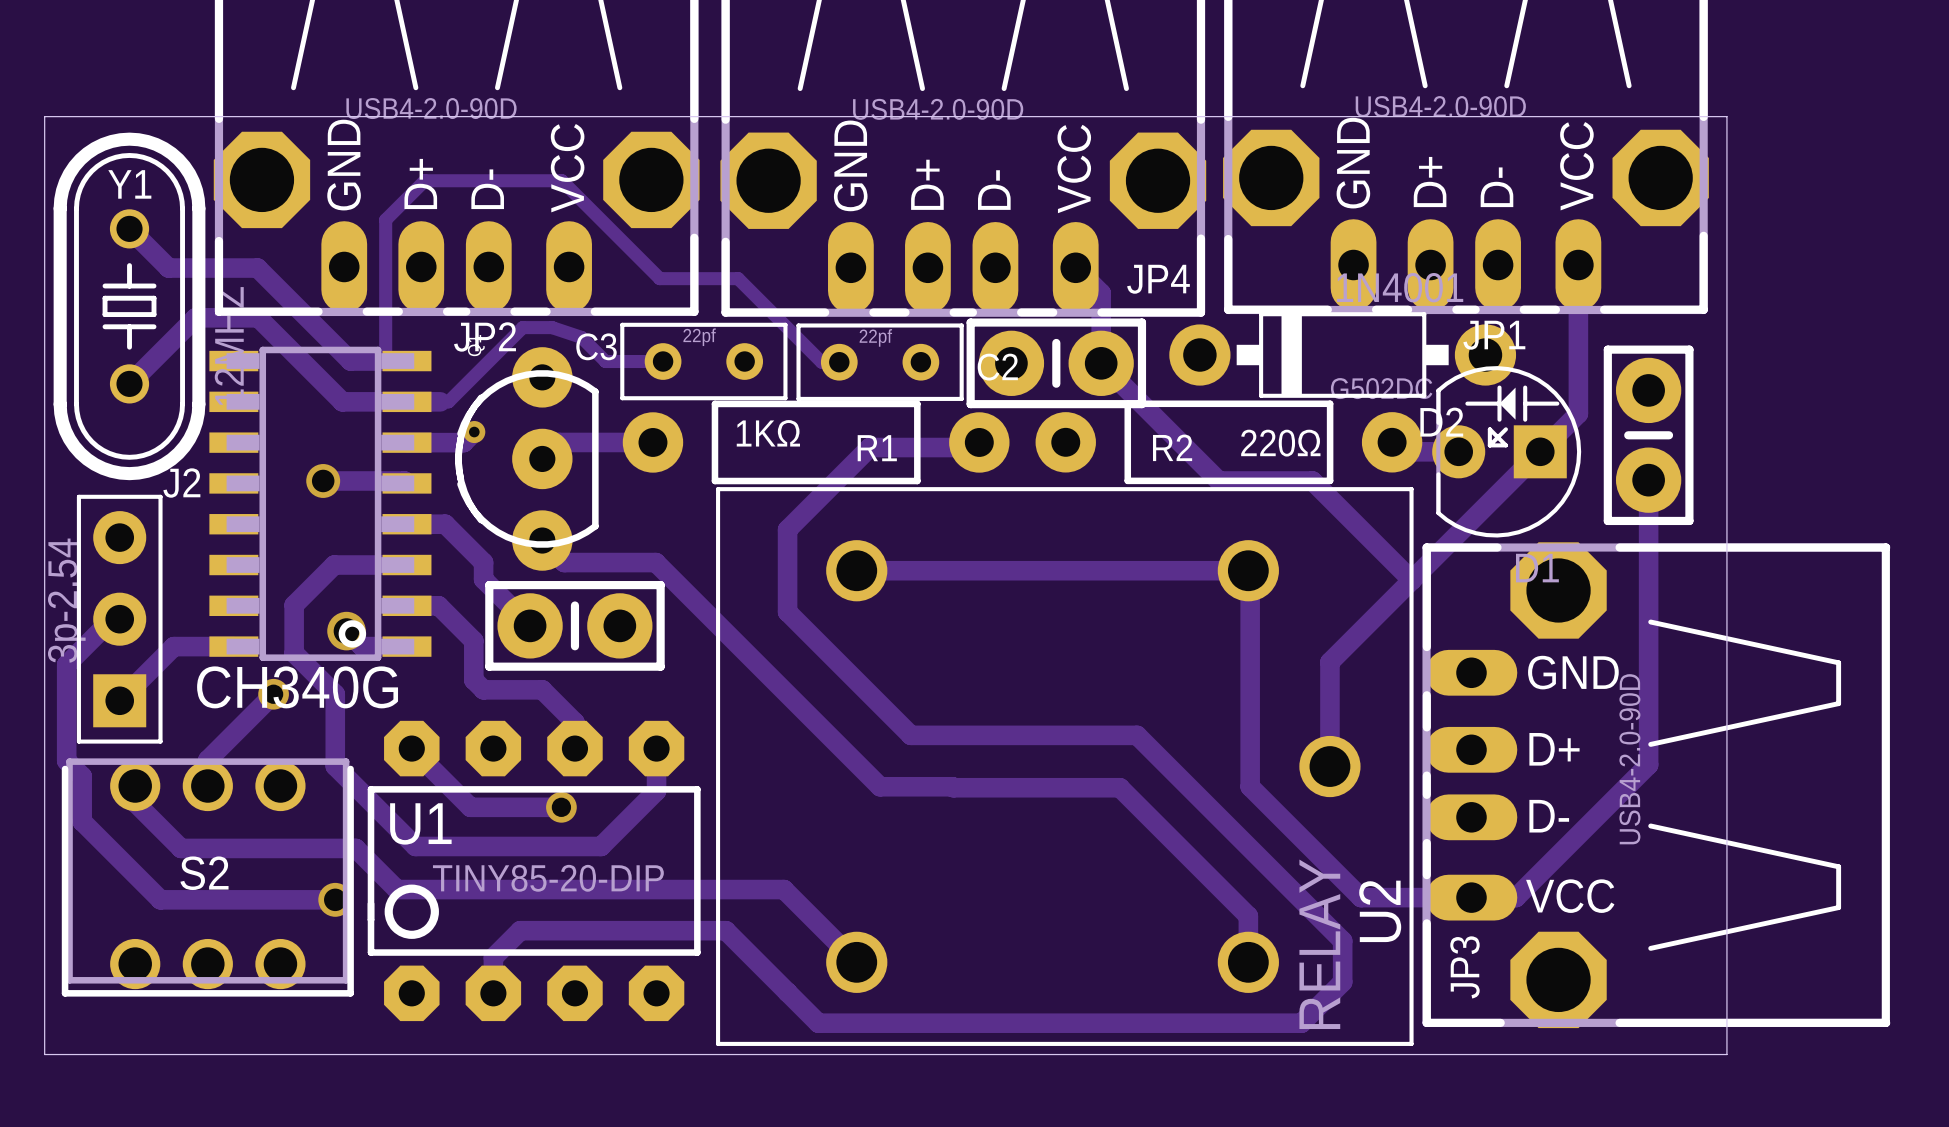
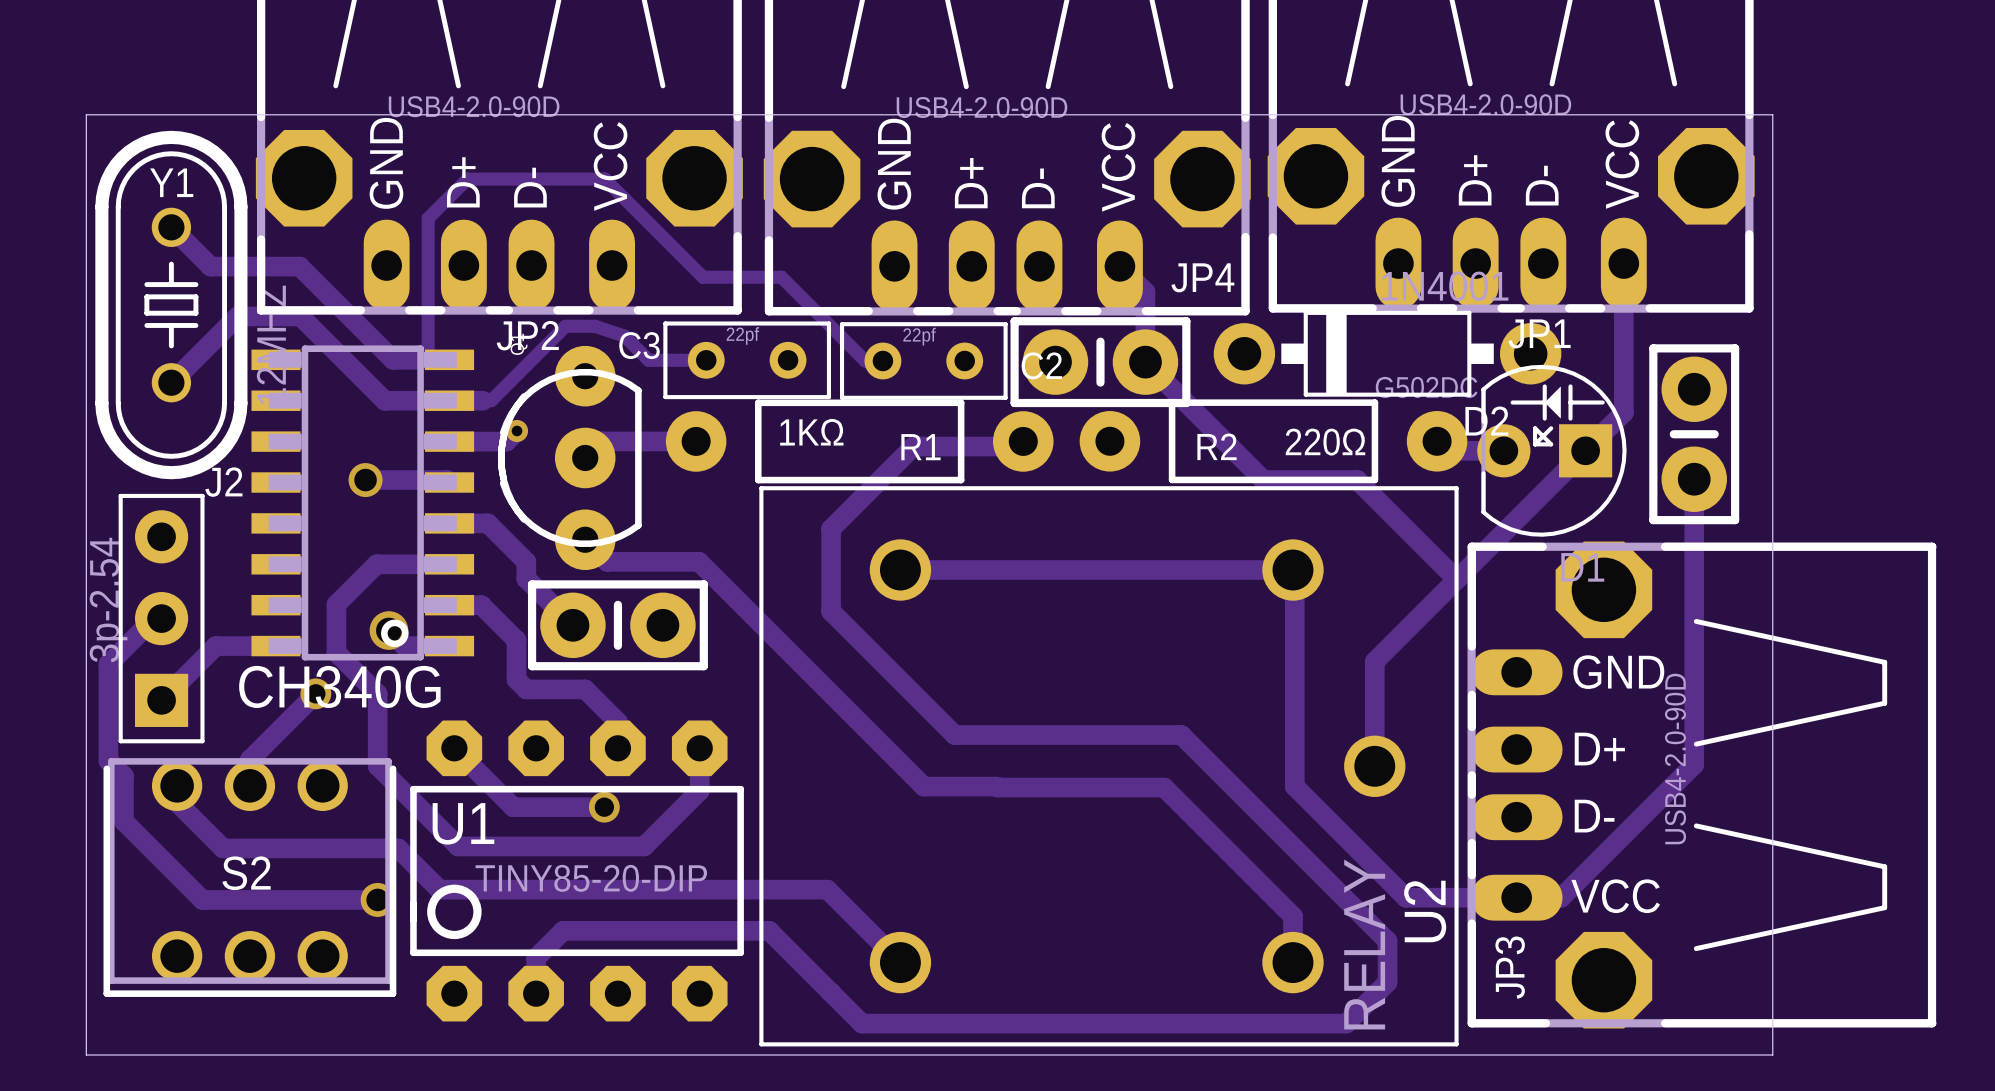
S2 footprint: [61, 758, 354, 997] -> [103, 758, 397, 997]

